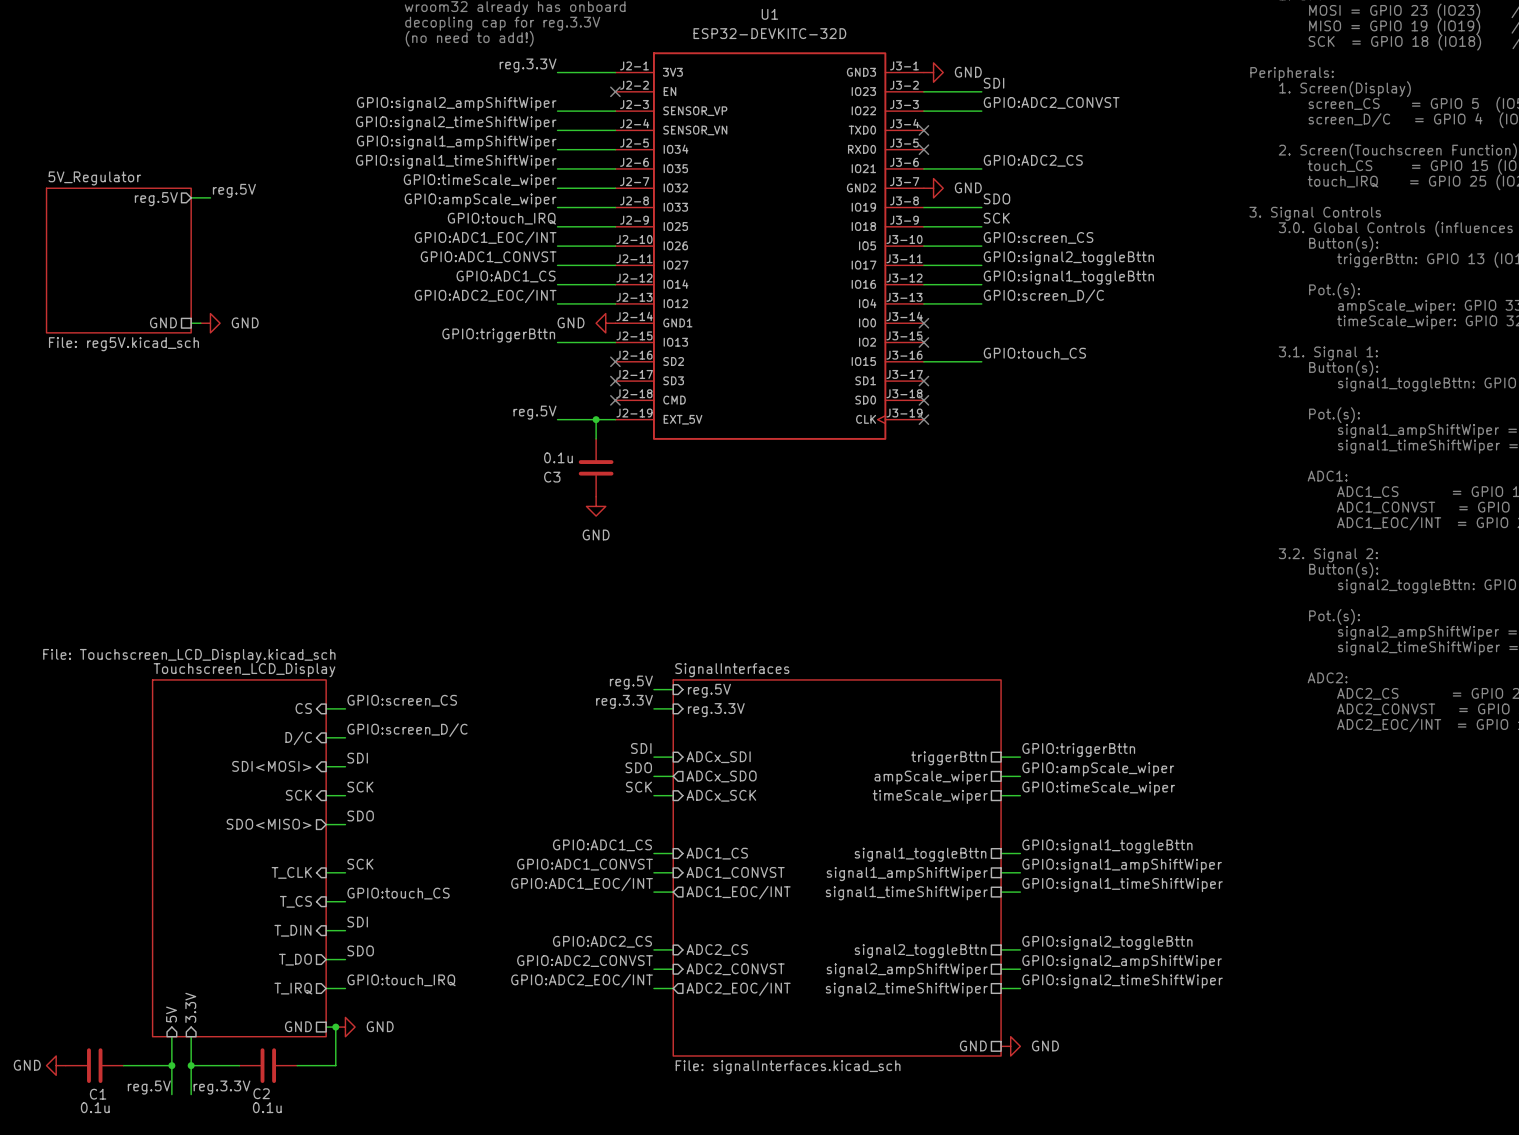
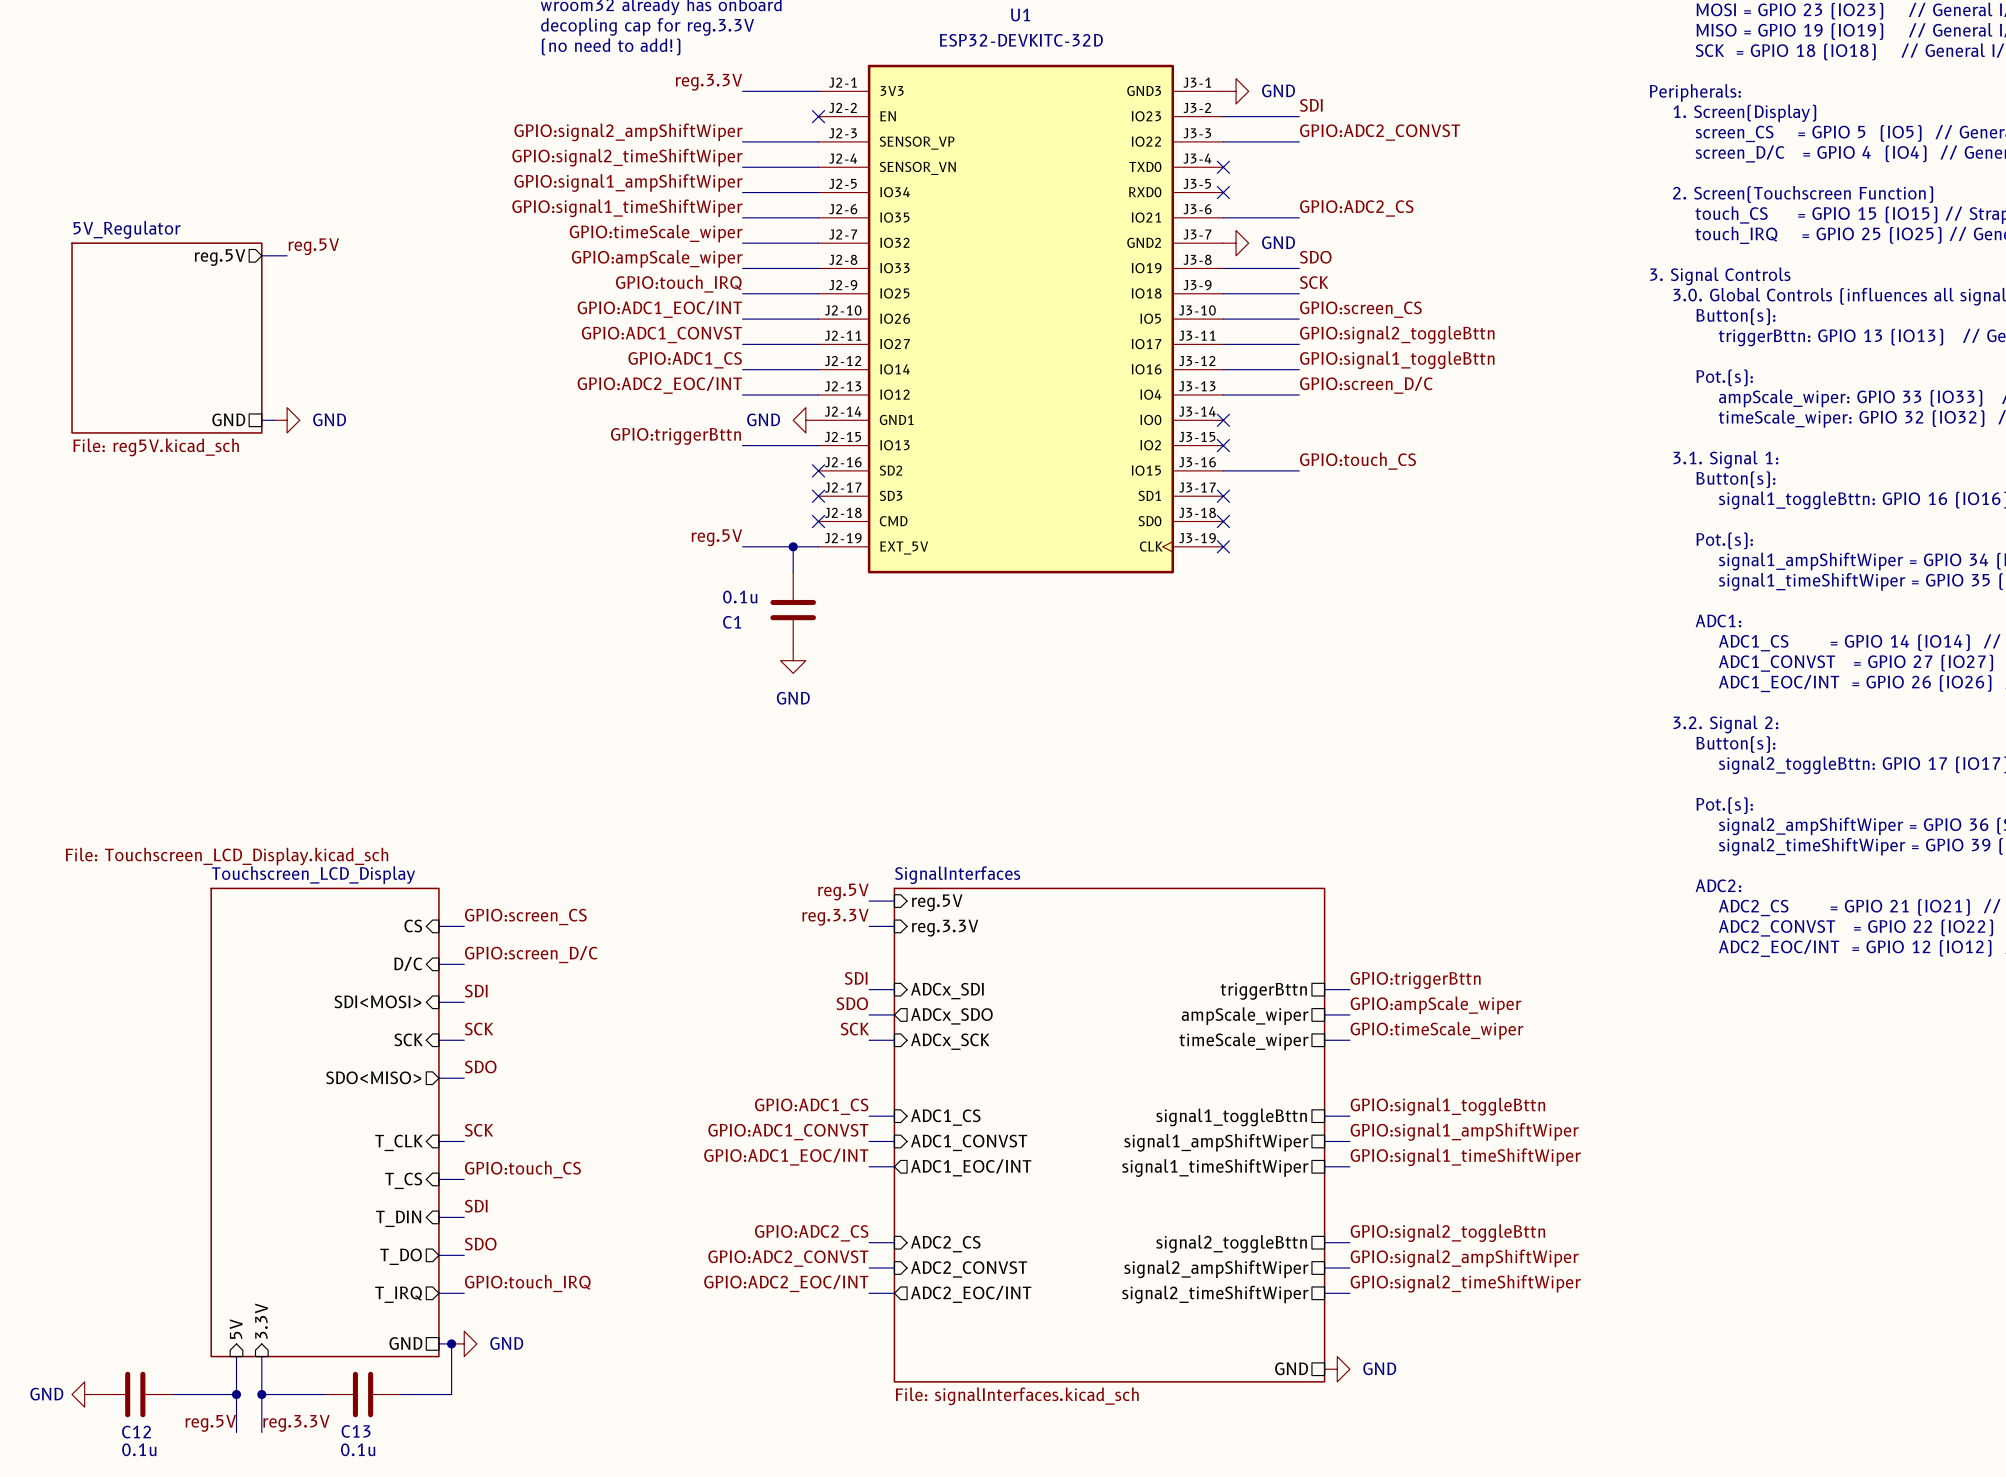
C3 name: C3 (552, 477) -> C1 (732, 622)
C2 name: C2 (261, 1093) -> C13 (356, 1431)
C1 name: C1 (98, 1094) -> C12 (136, 1432)

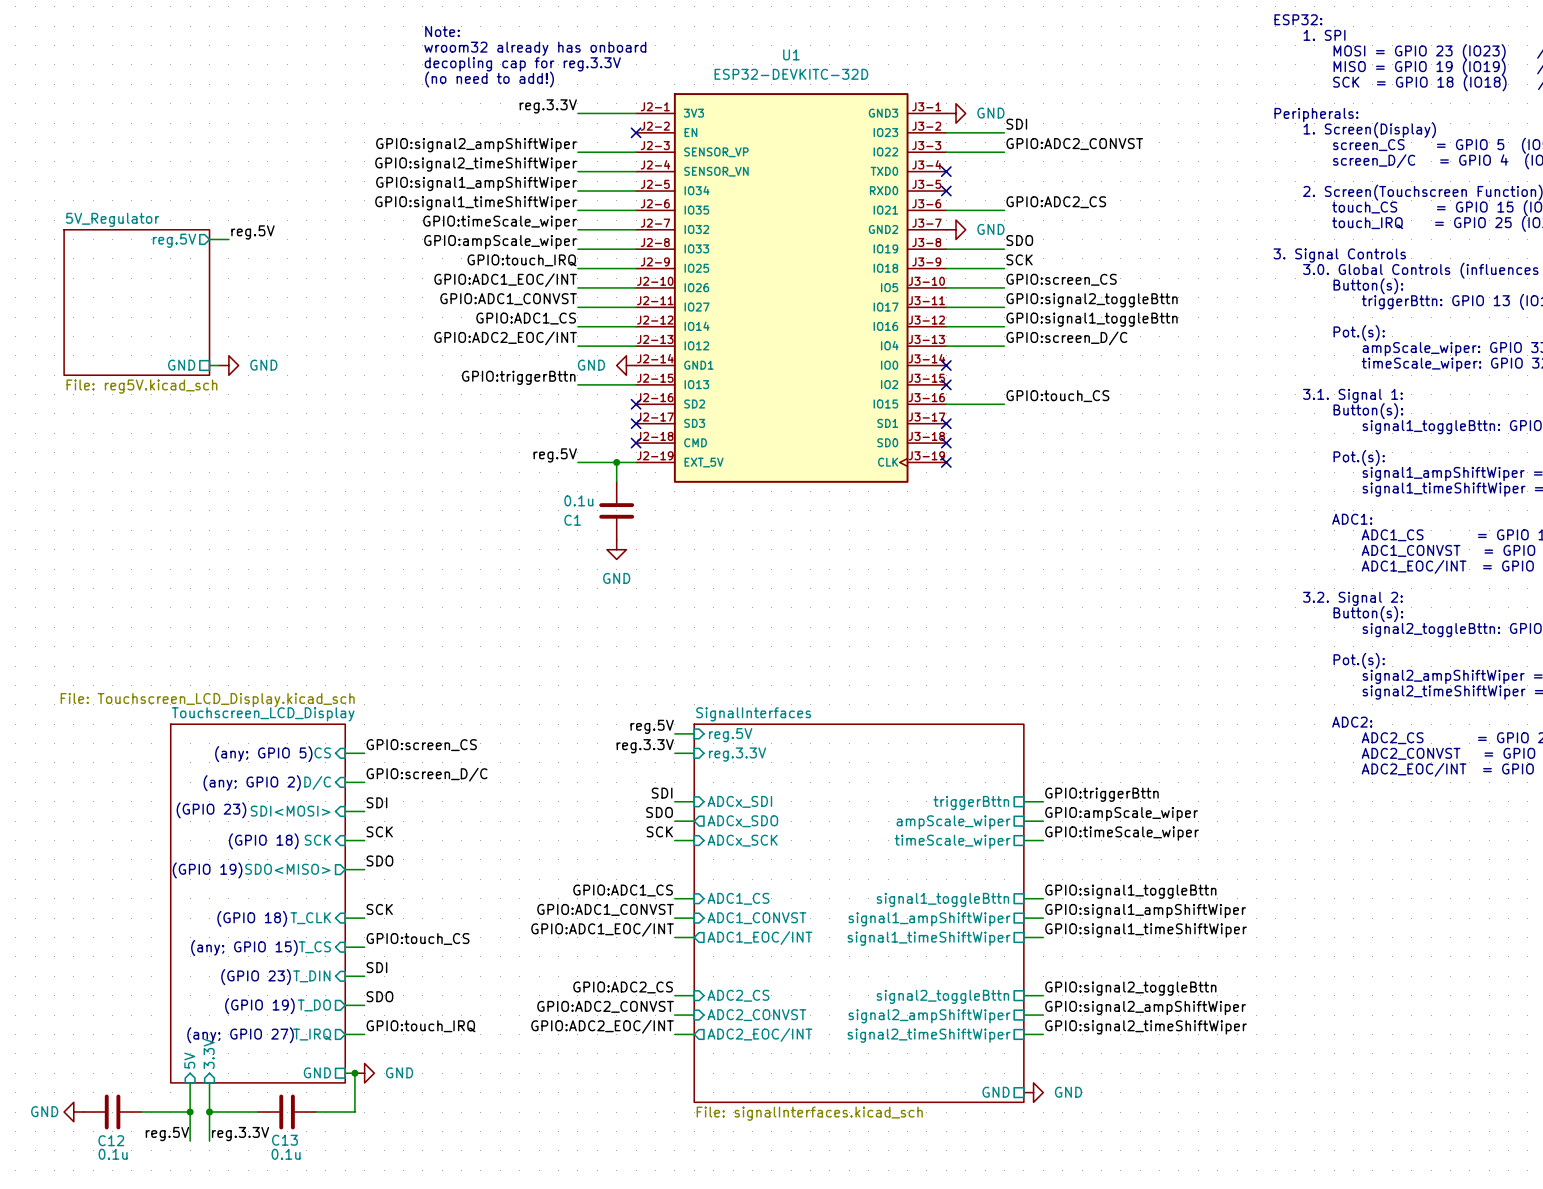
text: none -> (any; GPIO 5) (263, 754)
text: none -> (any; GPIO 2) (252, 783)
text: none -> (GPIO 23) (211, 810)
text: none -> (GPIO 18) (263, 841)
text: none -> (GPIO 19) (207, 870)
text: none -> (GPIO 18) (252, 918)
text: none -> (any; GPIO 15) (244, 948)
text: none -> (GPIO 23) (256, 977)
text: none -> (GPIO 19) (259, 1006)
text: none -> (any; GPIO 27) (240, 1035)

